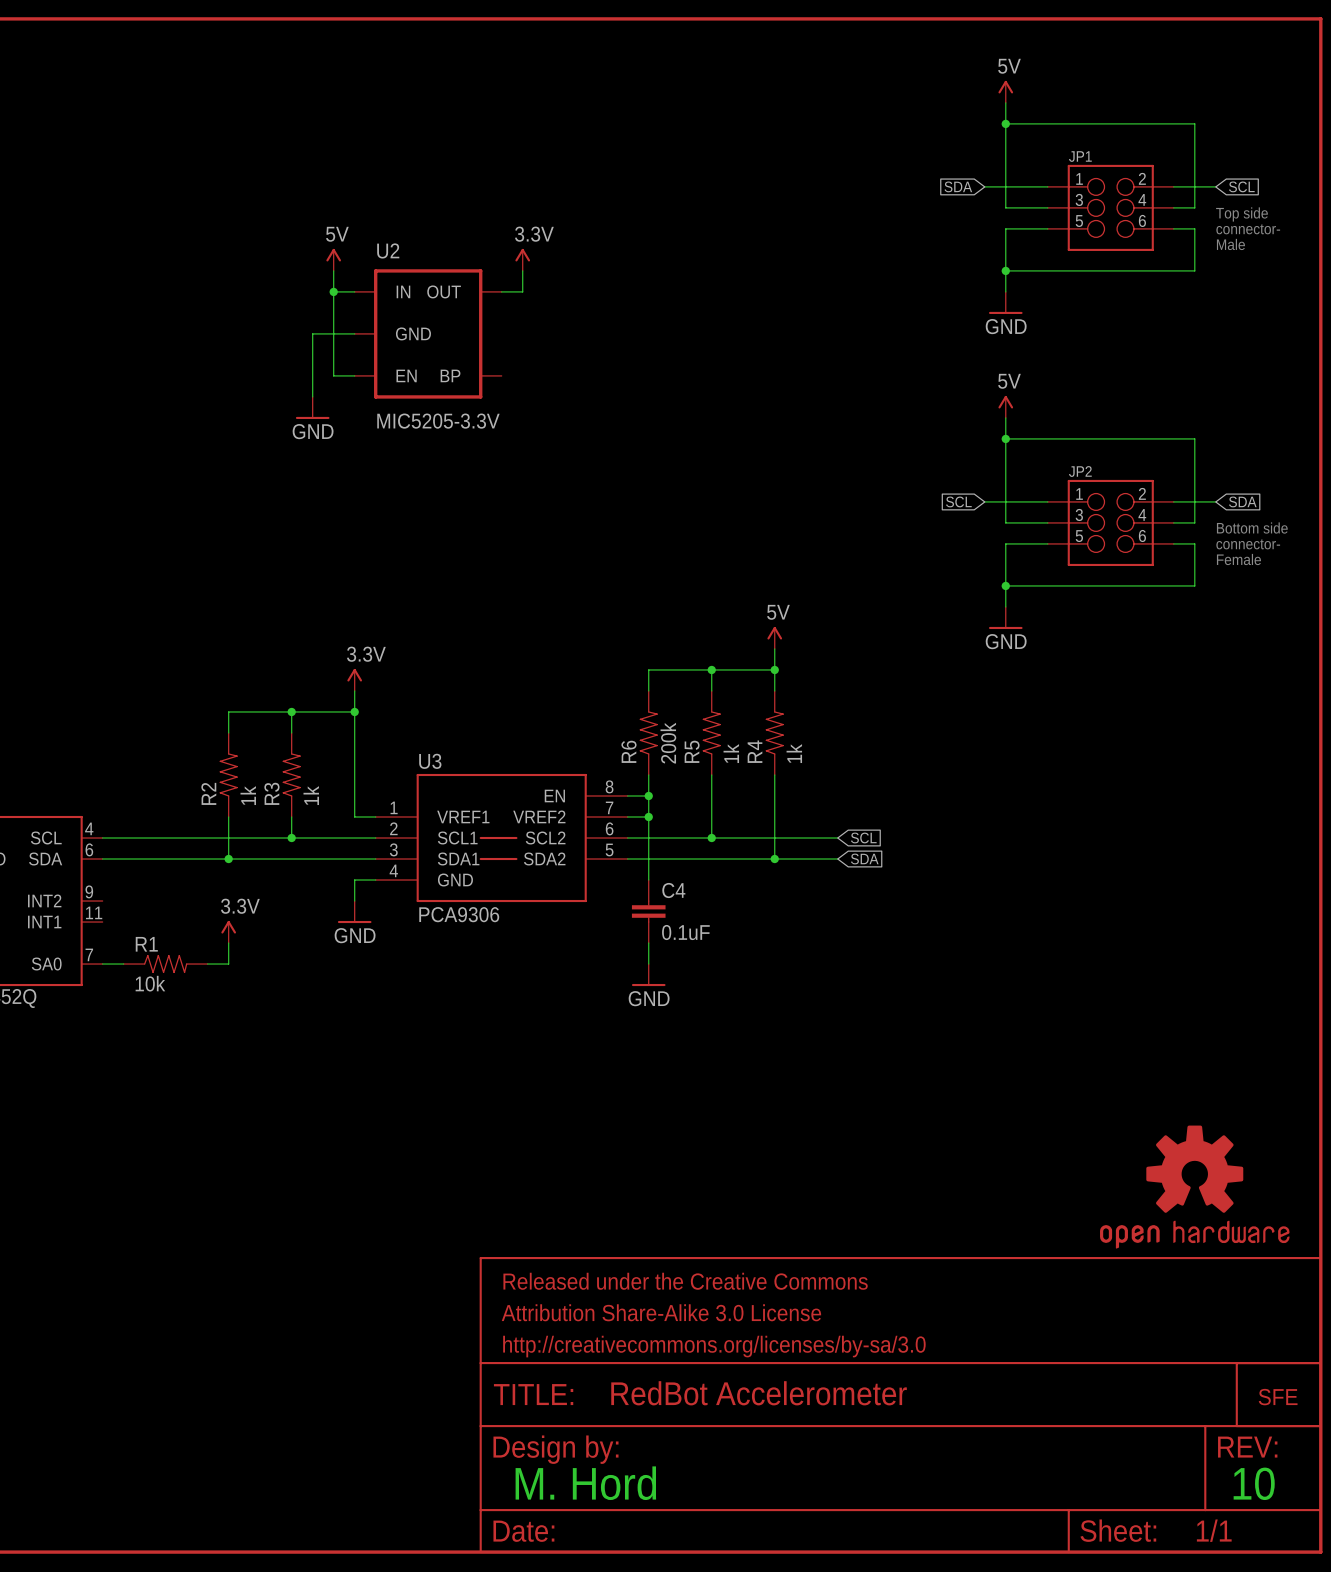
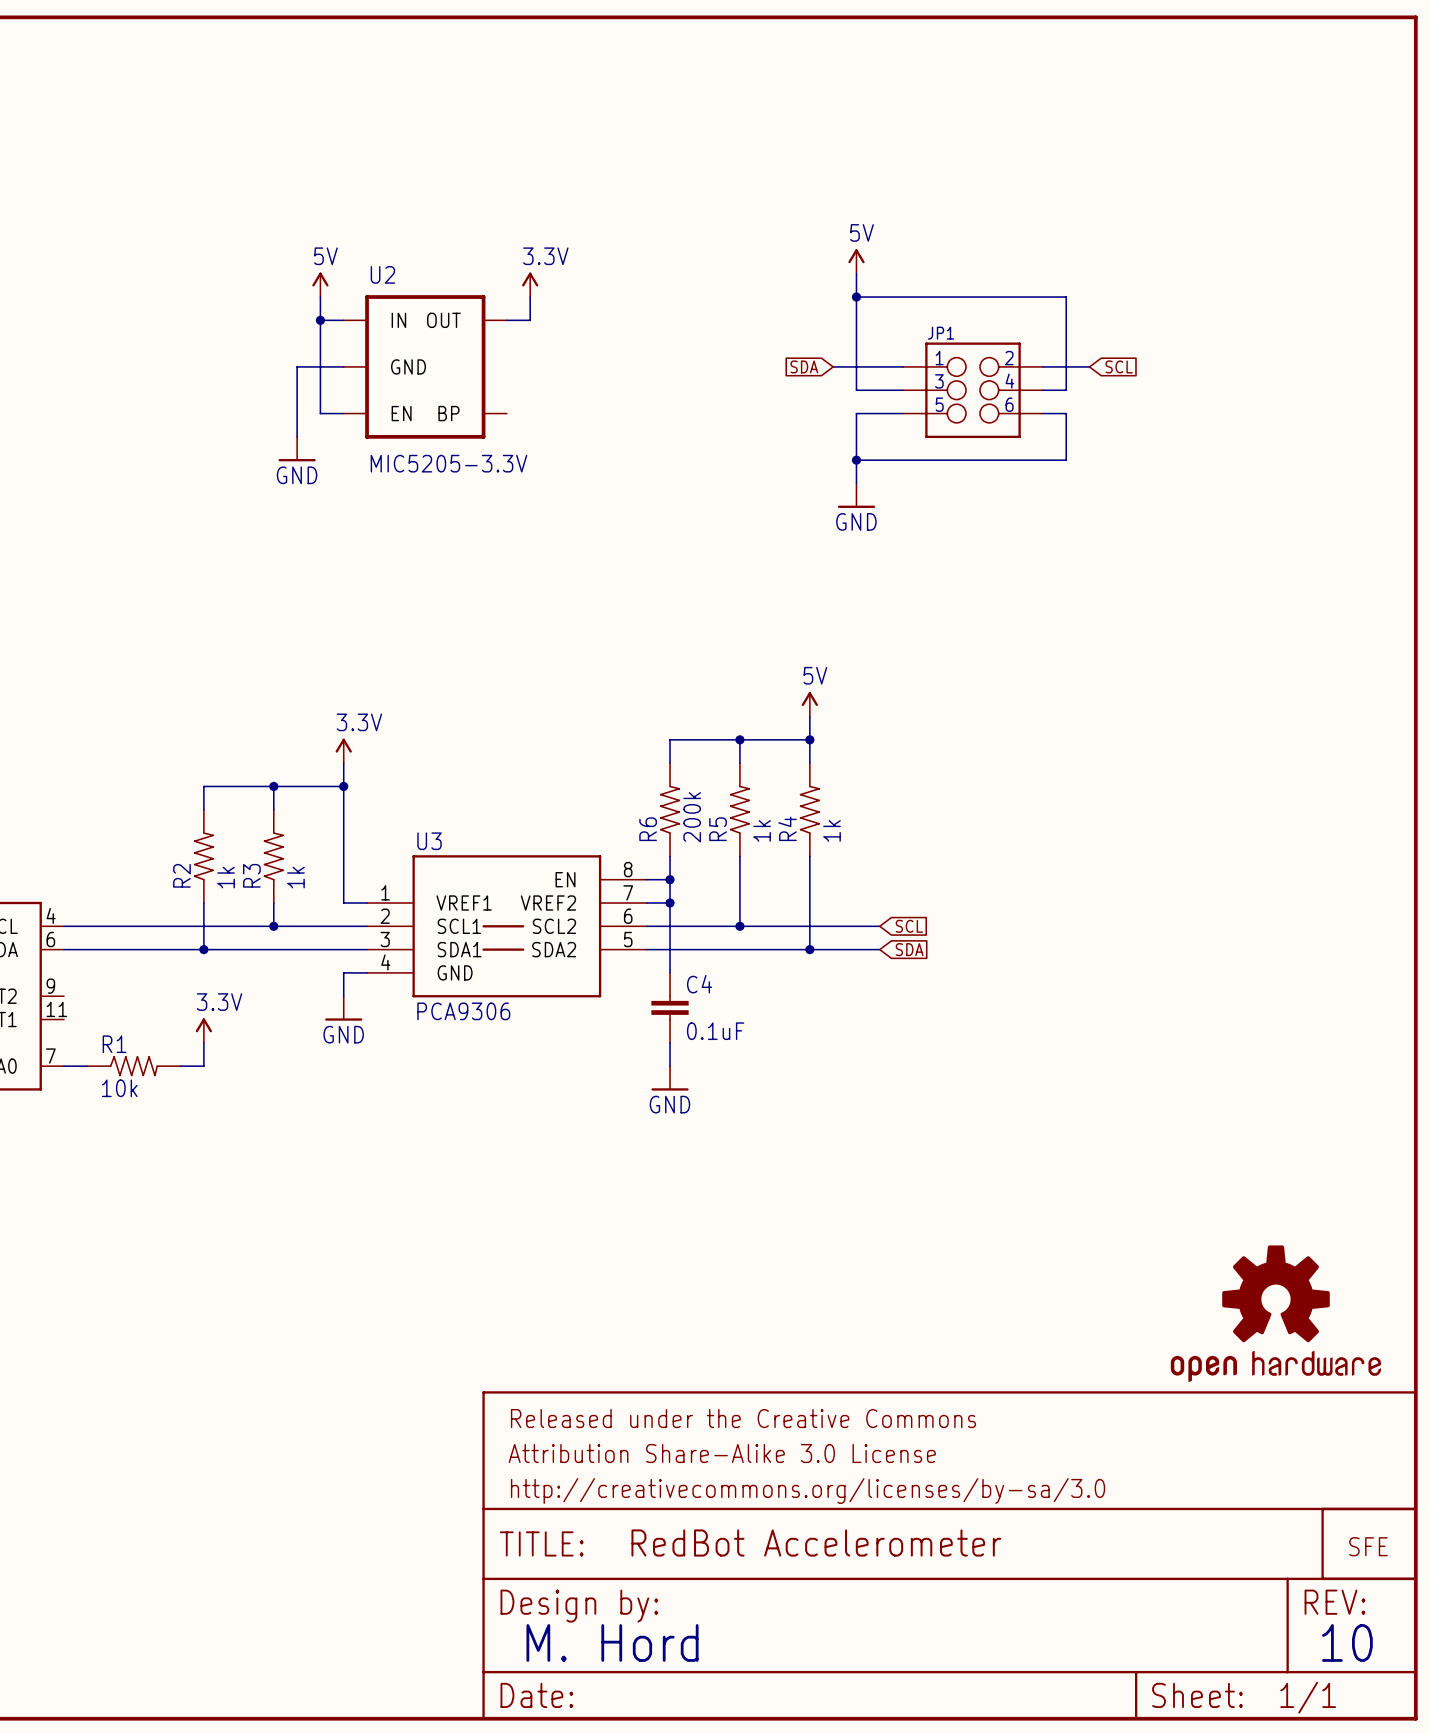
power symbol: 5V (1005, 91) -> none
wire: (1005, 102) (1005, 207) (1047, 207) -> none
wire: (1005, 123) (1194, 123) (1194, 207) (1173, 207) -> none
junction: (1005, 123) -> none
global label: SDA (958, 186) -> none
wire: (984, 186) (1047, 186) -> none
wire: (1173, 186) (1215, 186) -> none
global label: SCL (1241, 186) -> none
JP1 position: (1110, 207) -> (973, 390)
text: Top side (1241, 214) -> none
wire: (1047, 228) (1005, 228) (1005, 270) (1194, 270) (1194, 228) (1173, 228) -> none
text: connector- (1248, 229) -> none
power symbol: none -> 5V (856, 261)
text: Male (1230, 244) -> none
wire: none -> (856, 273) (856, 390) (903, 390)
wire: none -> (856, 297) (1066, 297)
junction: none -> (856, 297)
junction: (1005, 270) -> none
wire: none -> (1066, 320) (1066, 390) (1042, 390)
power symbol: GND (1005, 302) -> none
global label: none -> SDA (804, 366)
wire: none -> (833, 366) (903, 366)
wire: none -> (1042, 366) (1089, 366)
global label: none -> SCL (1119, 366)
wire: none -> (903, 413) (856, 413) (856, 483)
wire: none -> (1042, 413) (1066, 413) (1066, 460) (856, 460)
power symbol: 5V (1005, 406) -> none
junction: none -> (856, 460)
wire: (1005, 417) (1005, 522) (1047, 522) -> none
wire: (1005, 438) (1194, 438) (1194, 522) (1173, 522) -> none
junction: (1005, 438) -> none
power symbol: none -> GND (856, 495)
global label: SCL (958, 501) -> none
wire: (984, 501) (1047, 501) -> none
wire: (1173, 501) (1215, 501) -> none
global label: SDA (1242, 501) -> none
JP2: (1110, 522) -> none
text: Bottom side (1252, 528) -> none
wire: (1047, 543) (1005, 543) (1005, 606) -> none
wire: (1173, 543) (1194, 543) (1194, 585) (1005, 585) -> none
text: connector- (1248, 544) -> none
text: Female (1238, 559) -> none
junction: (1005, 585) -> none
power symbol: GND (1005, 618) -> none

